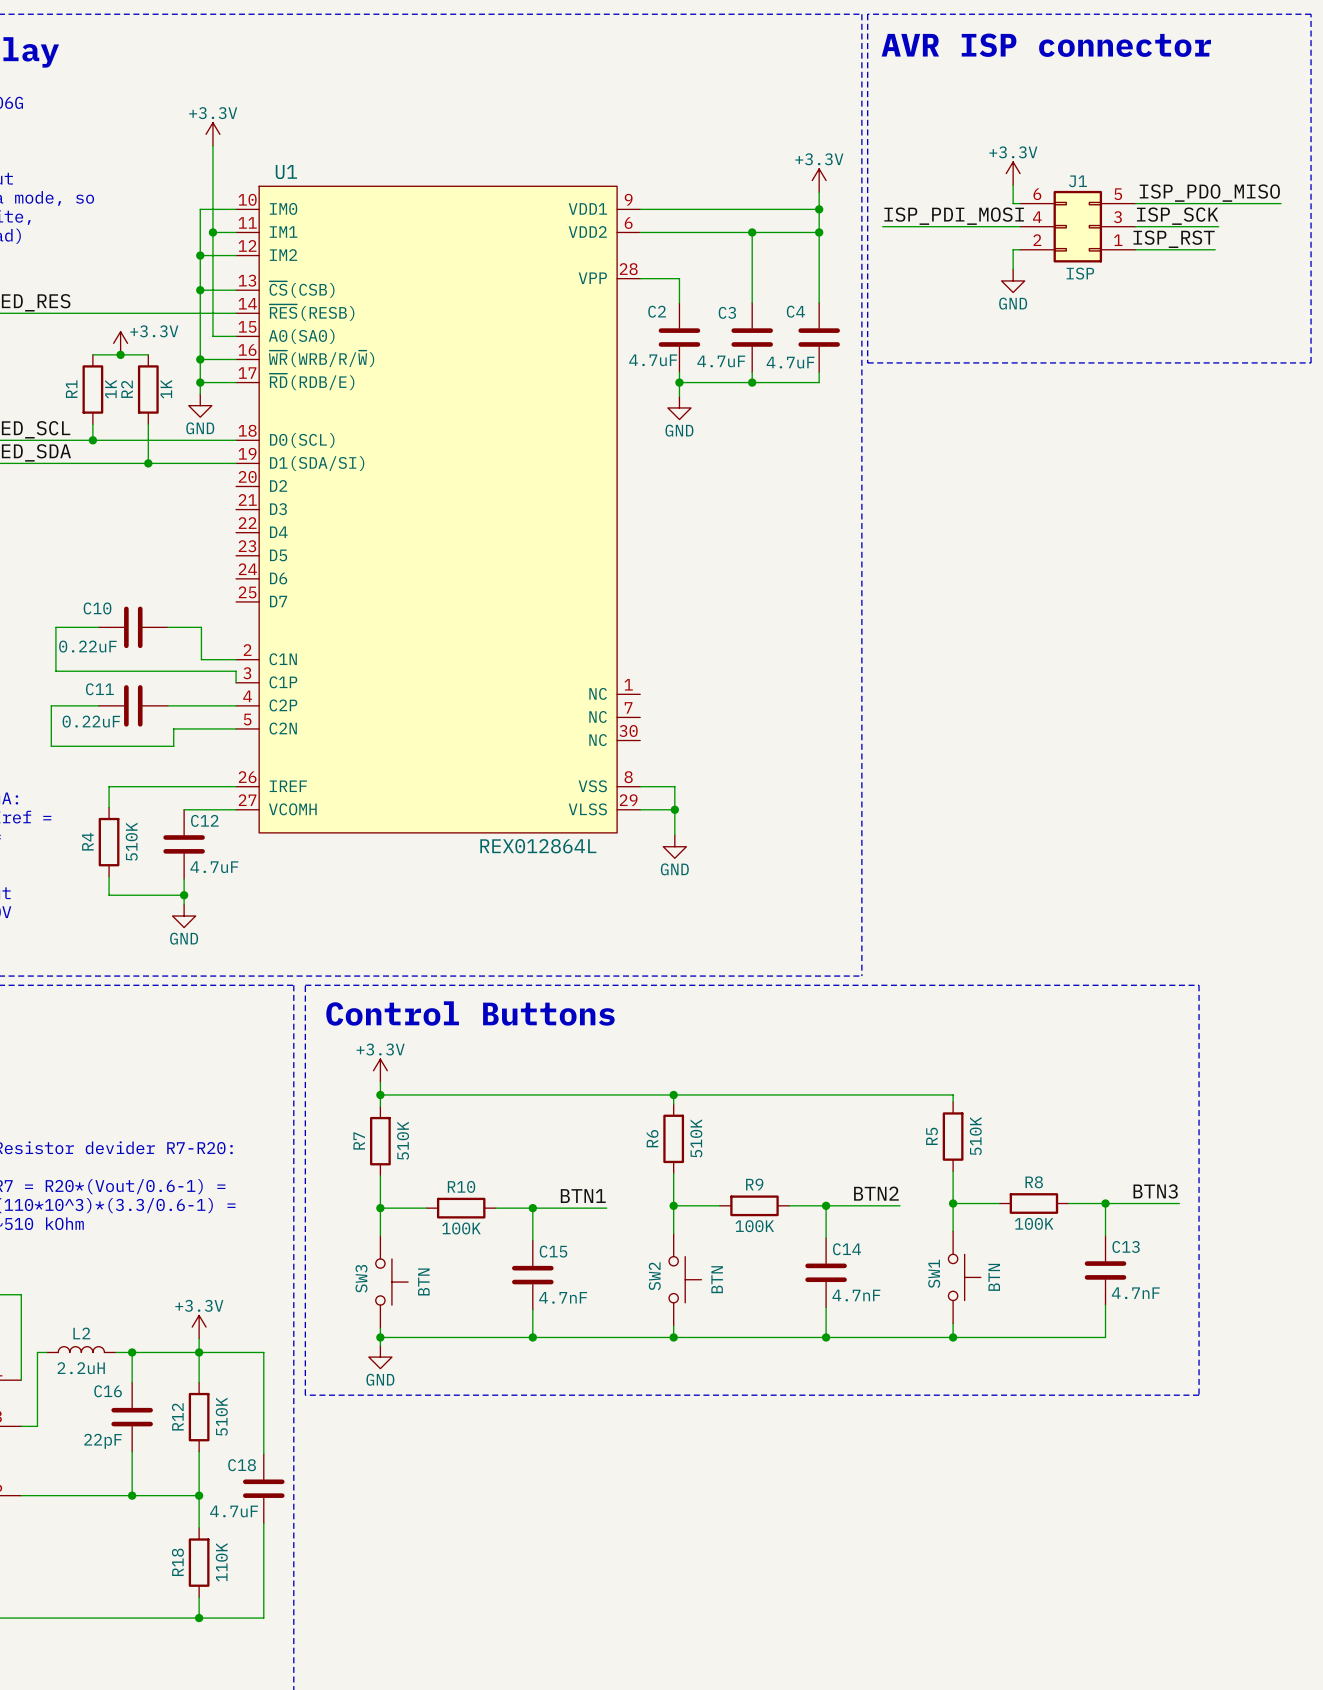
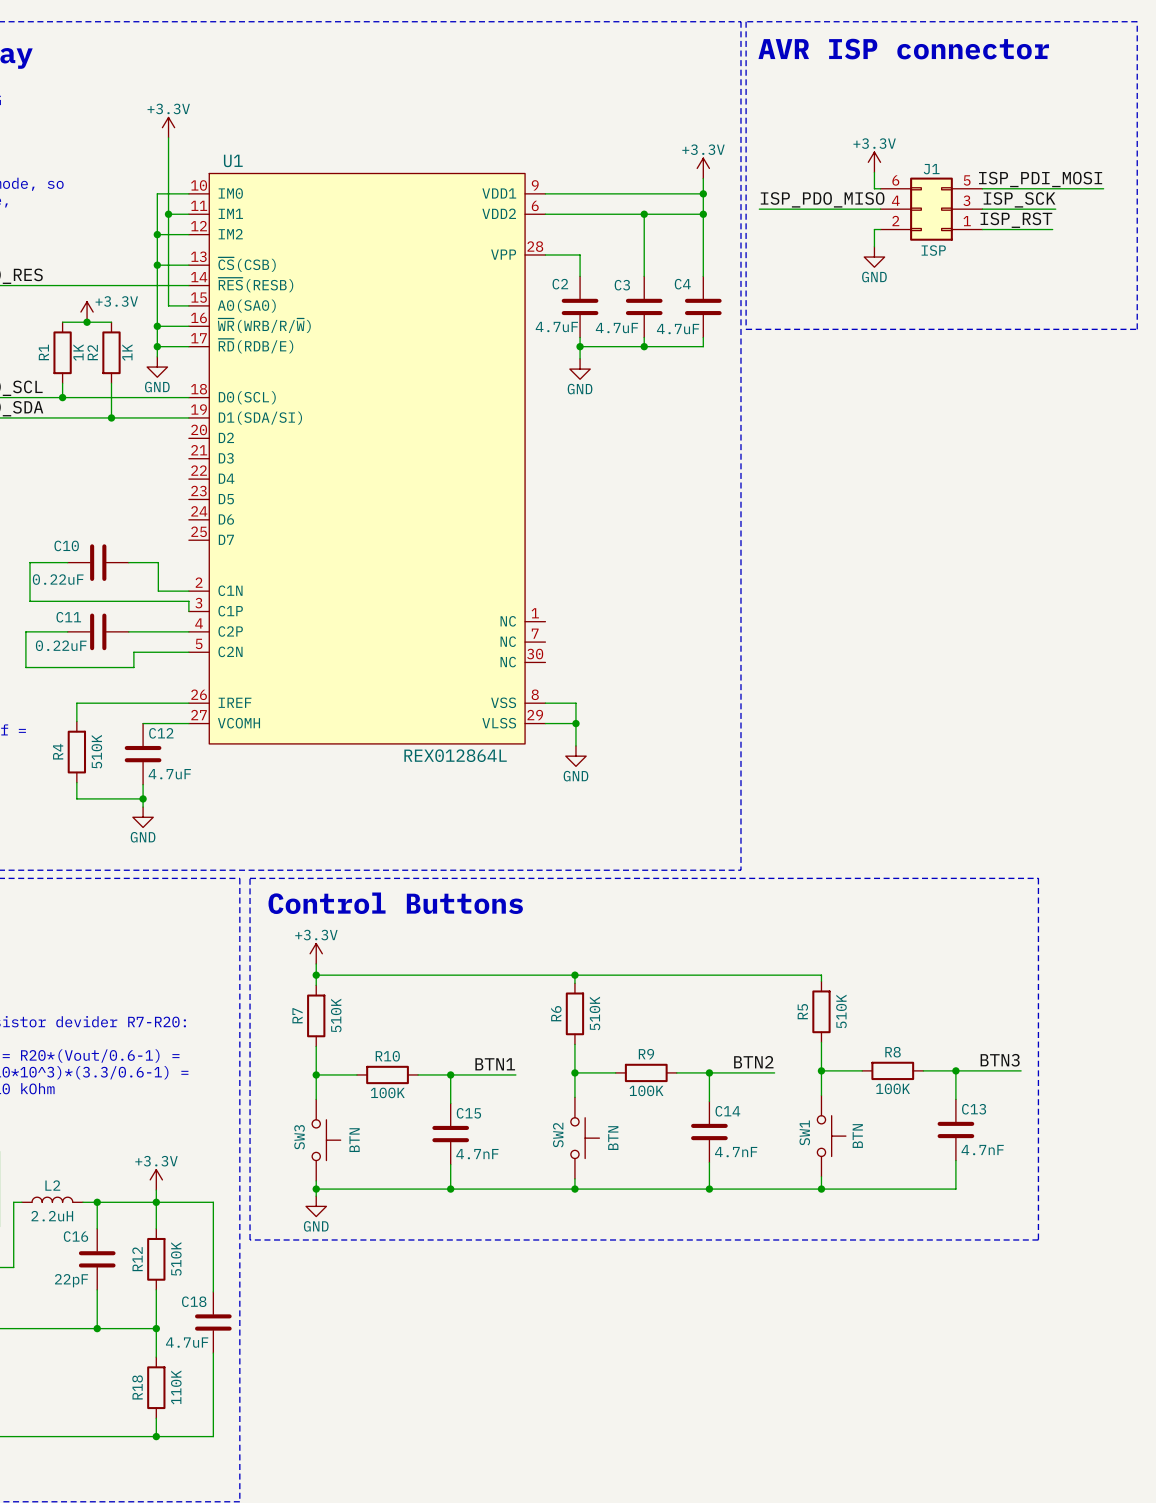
label: ISP_PDO_MISO (1209, 193) -> ISP_PDI_MOSI (1040, 179)
wire: (1272, 203) (1281, 203) -> none
label: ISP_PDI_MOSI (954, 216) -> ISP_PDO_MISO (822, 199)

